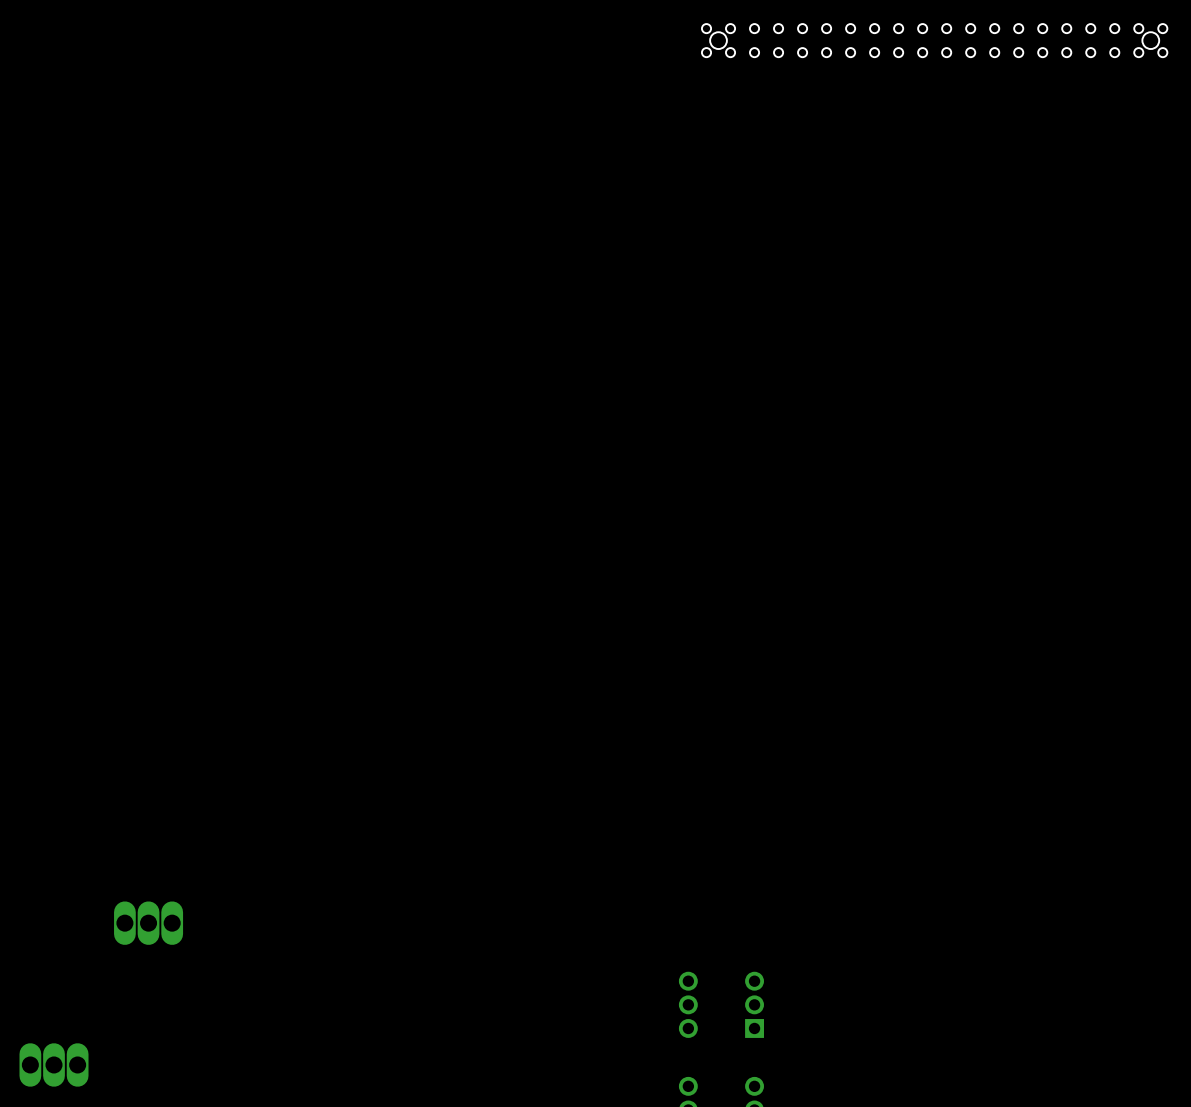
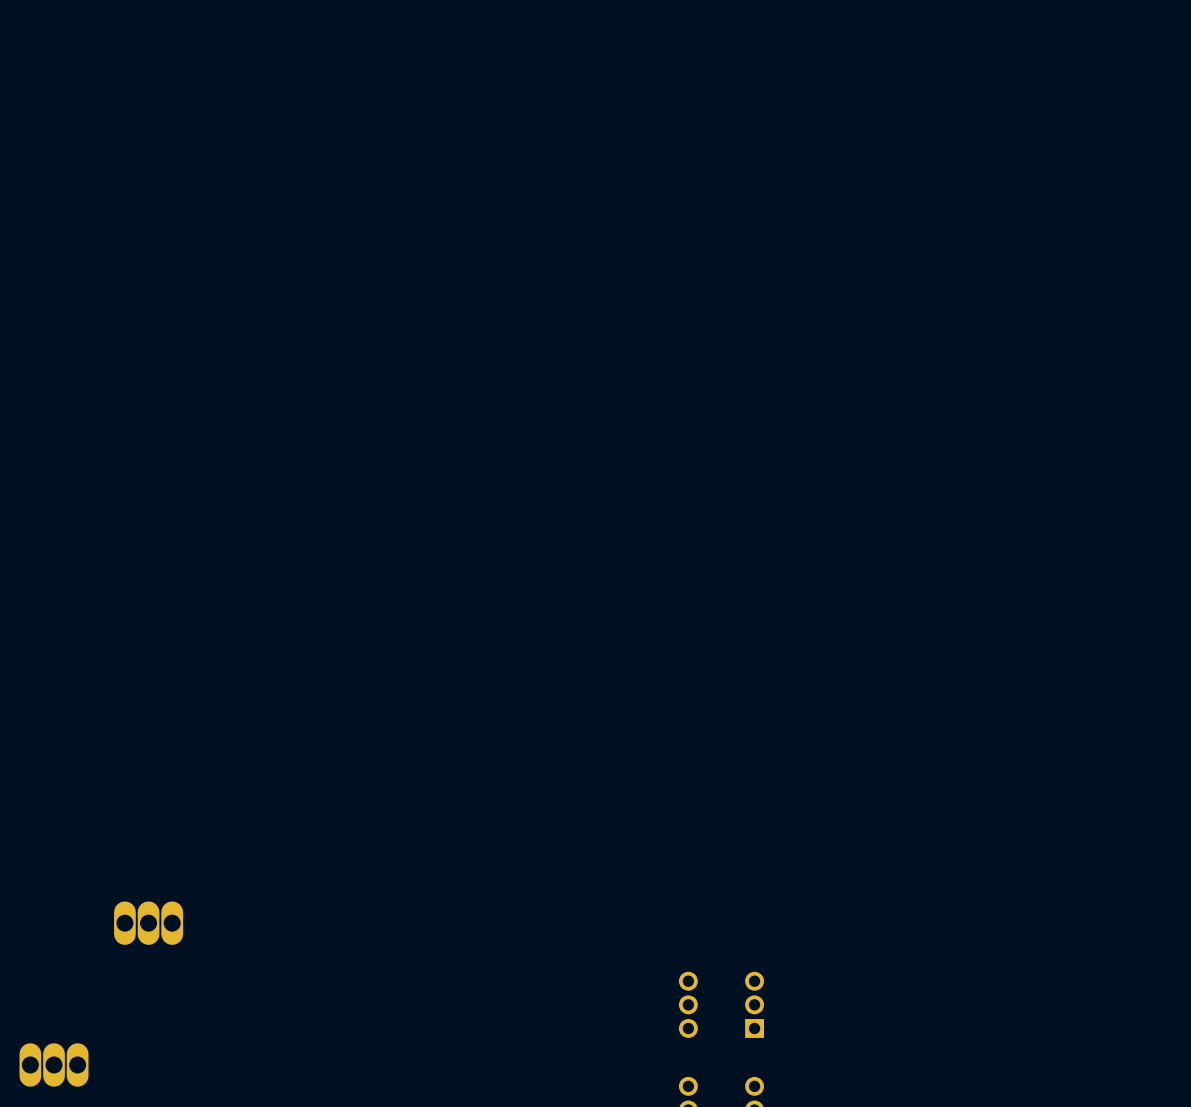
part: (934, 40) -> none

